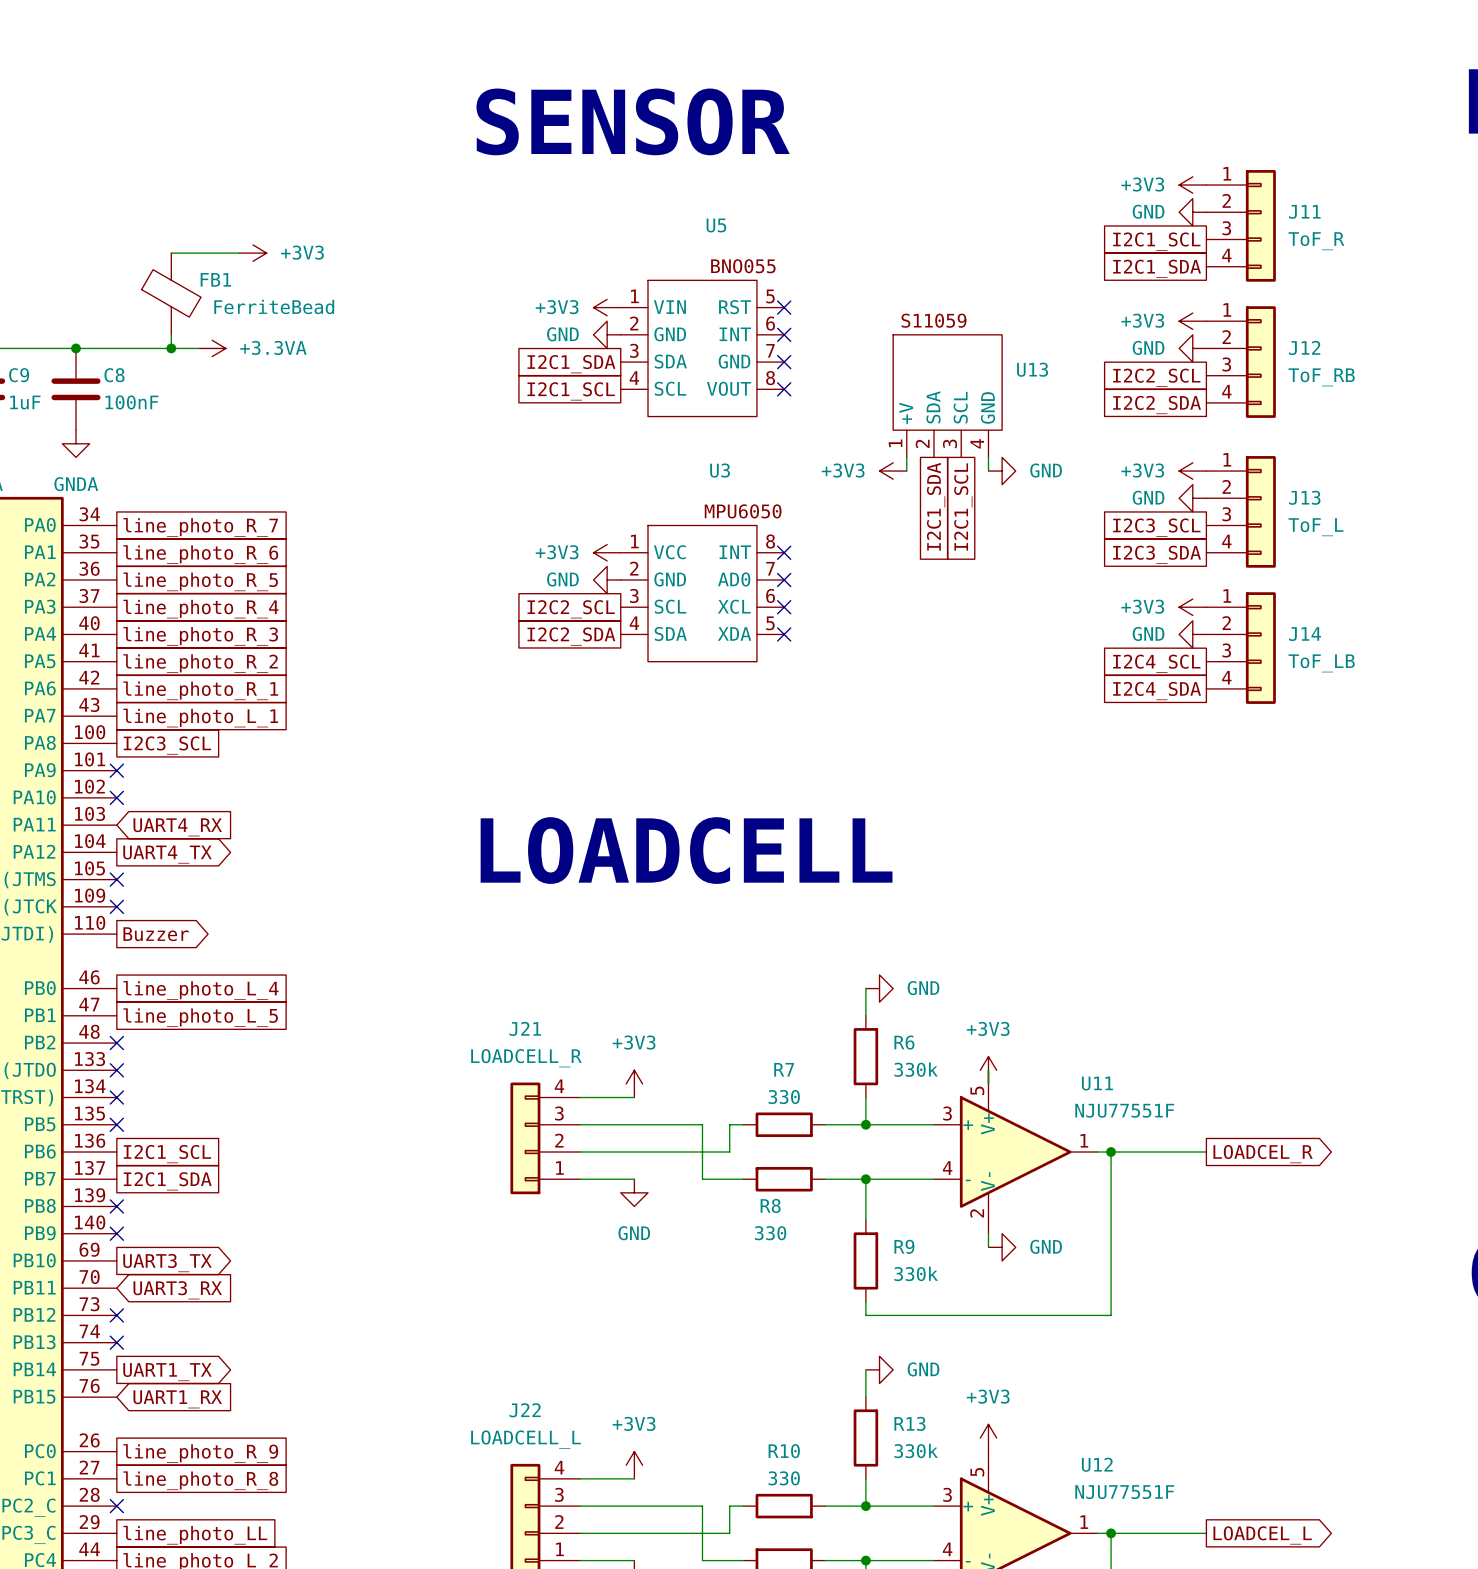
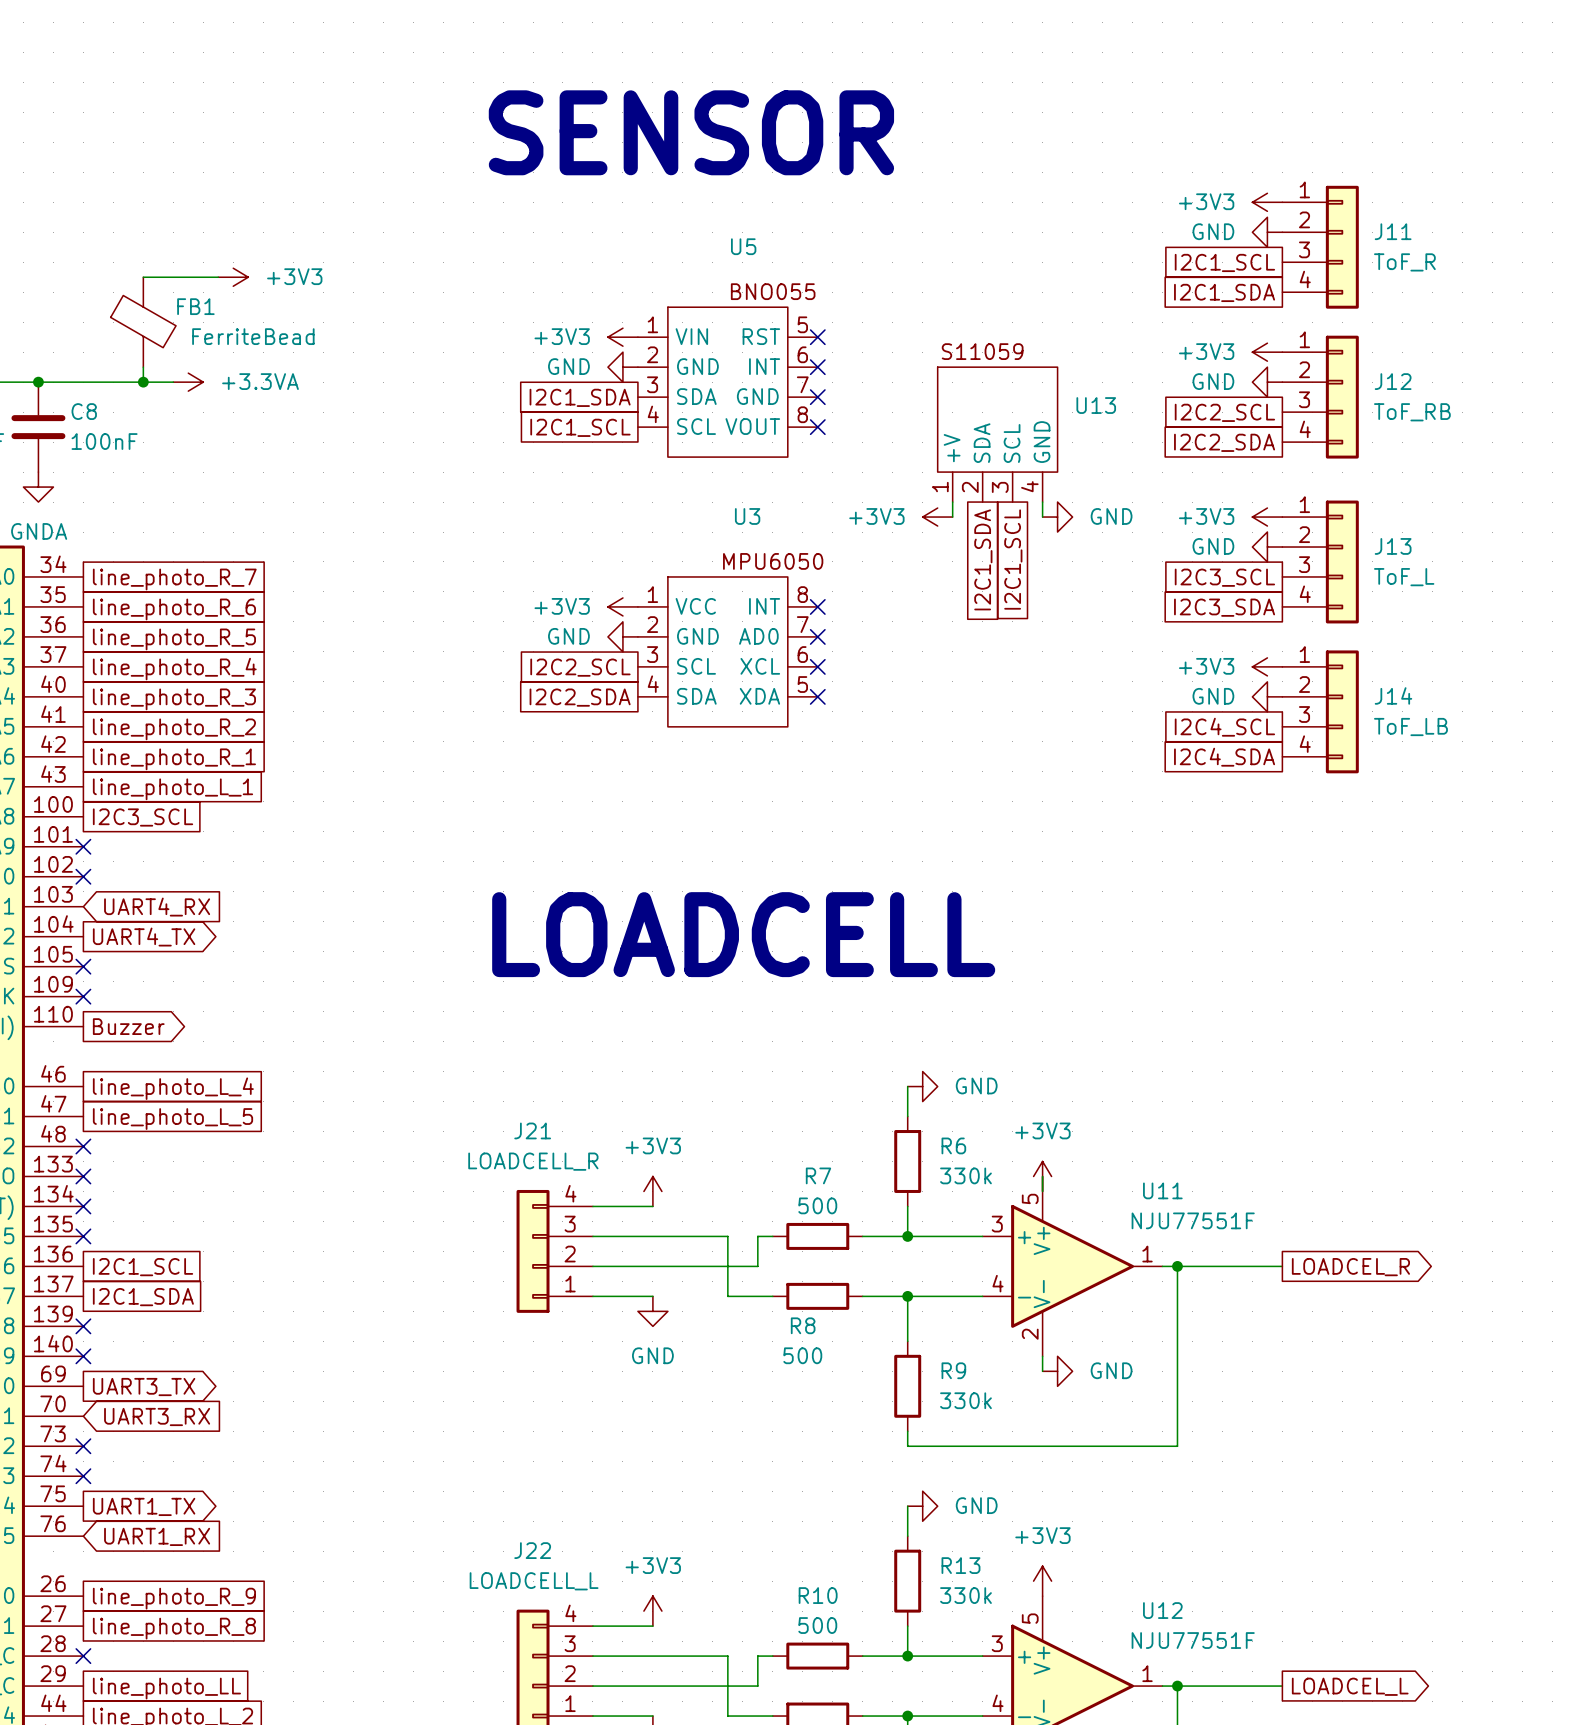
R7 value: 330 (784, 1097) -> 500 (817, 1205)
R8 value: 330 (770, 1233) -> 500 (802, 1355)
R10 value: 330 (784, 1478) -> 500 (817, 1625)

